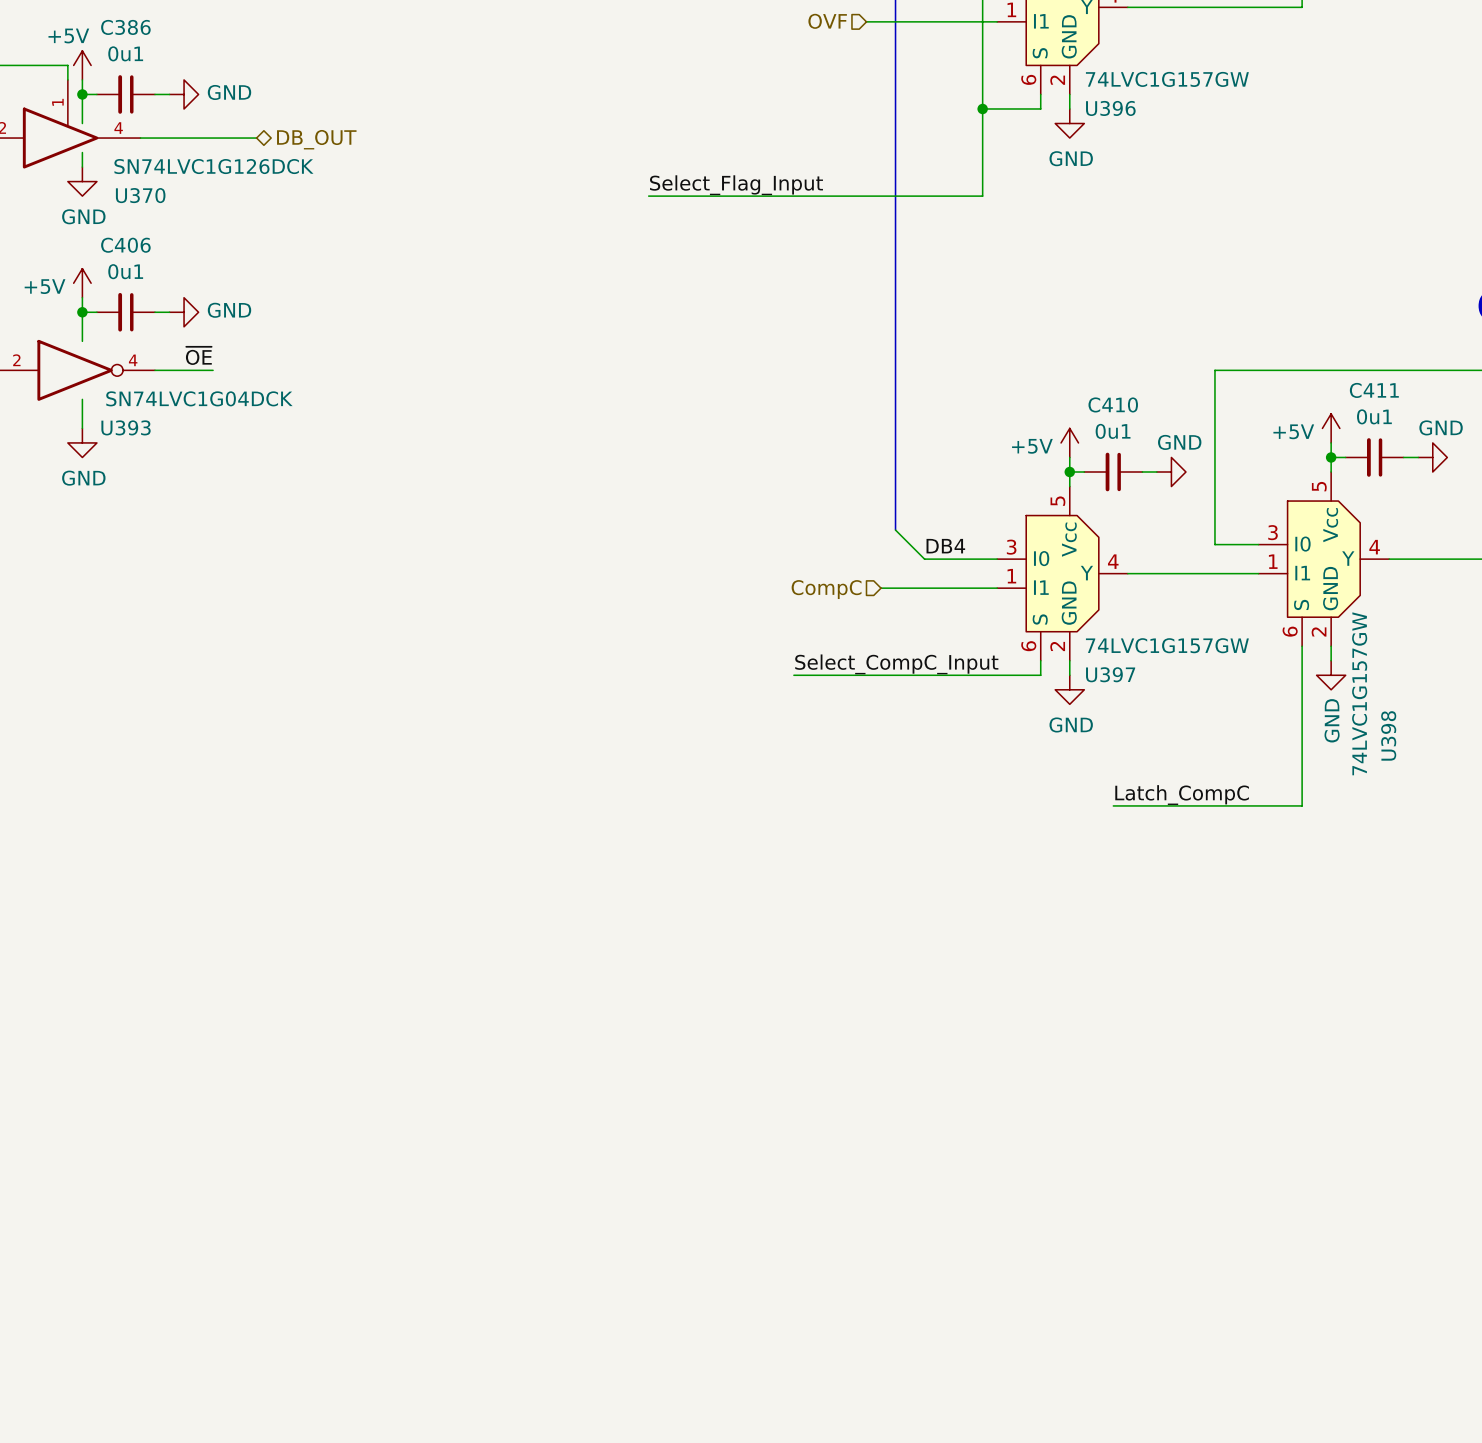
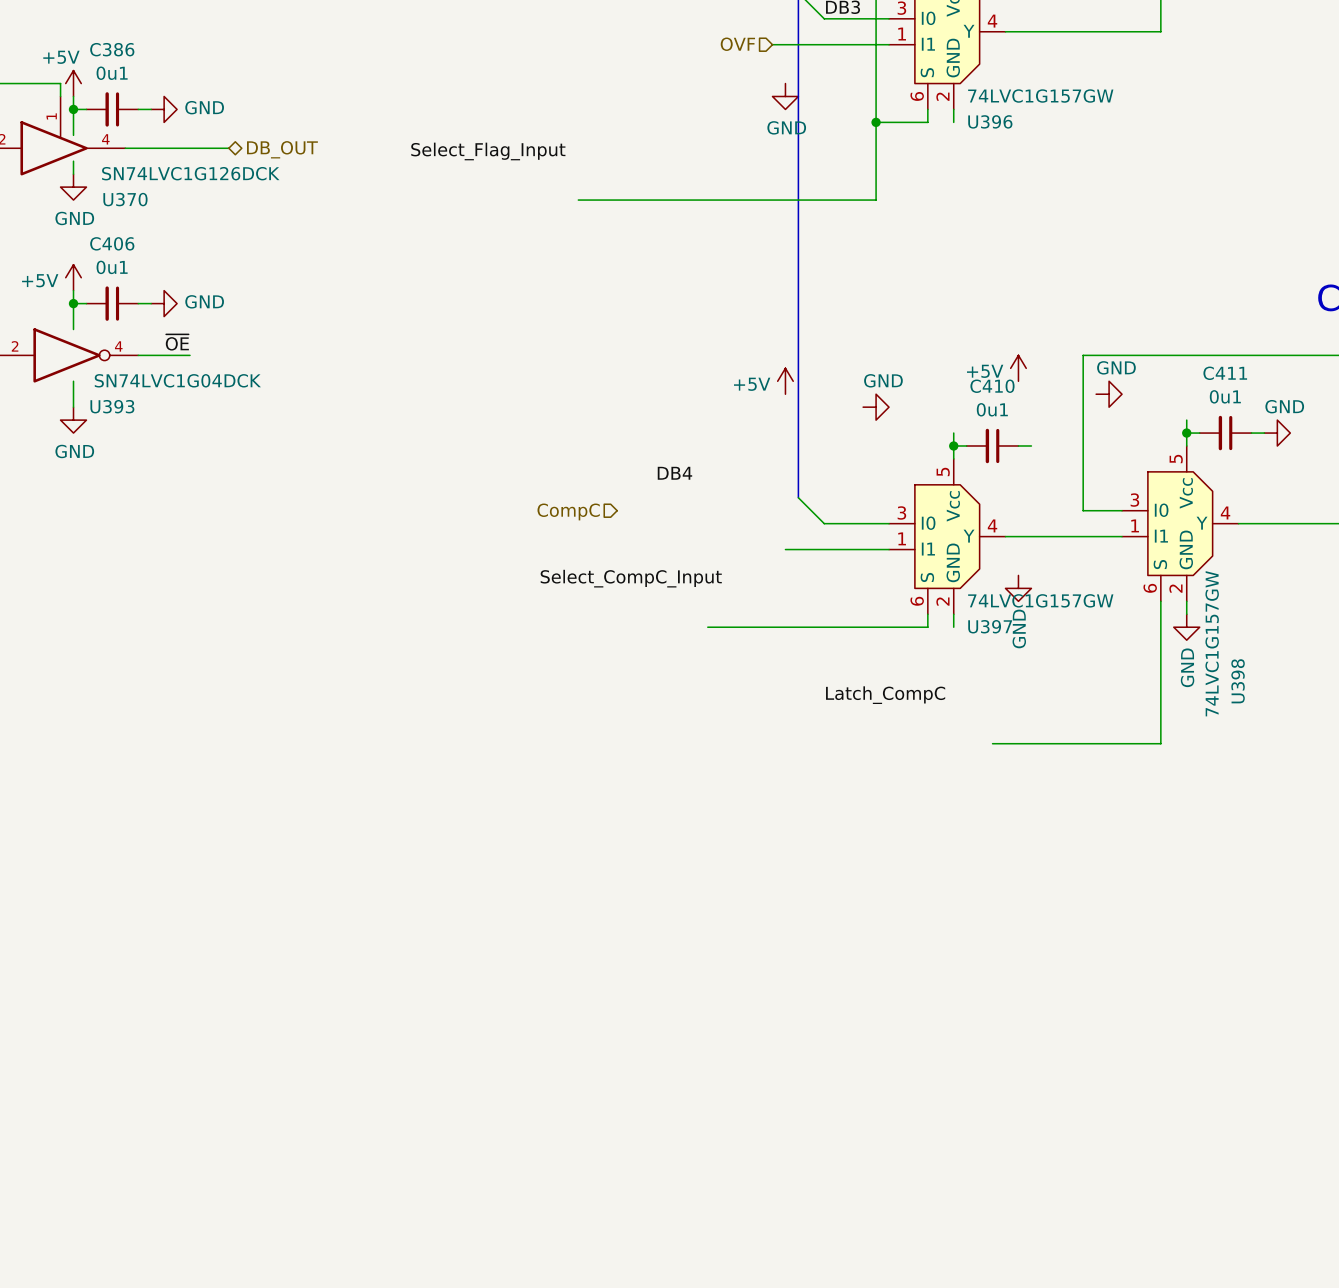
power symbol: none -> GND (785, 96)
power symbol: GND (1069, 123) -> none
label position: Select_Flag_Input (736, 185) -> Select_Flag_Input (488, 151)
power symbol: none -> +5V (785, 381)
power symbol: none -> GND (1109, 394)
power symbol: none -> GND (876, 407)
power symbol: +5V (1331, 428) -> none
power symbol position: +5V (1069, 442) -> +5V (1018, 368)
power symbol: GND (1171, 471) -> none
label position: DB4 (945, 546) -> DB4 (674, 473)
hierarchical label position: CompC (826, 589) -> CompC (568, 511)
power symbol: none -> GND (1018, 588)
label position: Select_CompC_Input (896, 664) -> Select_CompC_Input (631, 578)
power symbol: GND (1069, 689) -> none
label position: Latch_CompC (1182, 795) -> Latch_CompC (885, 695)

